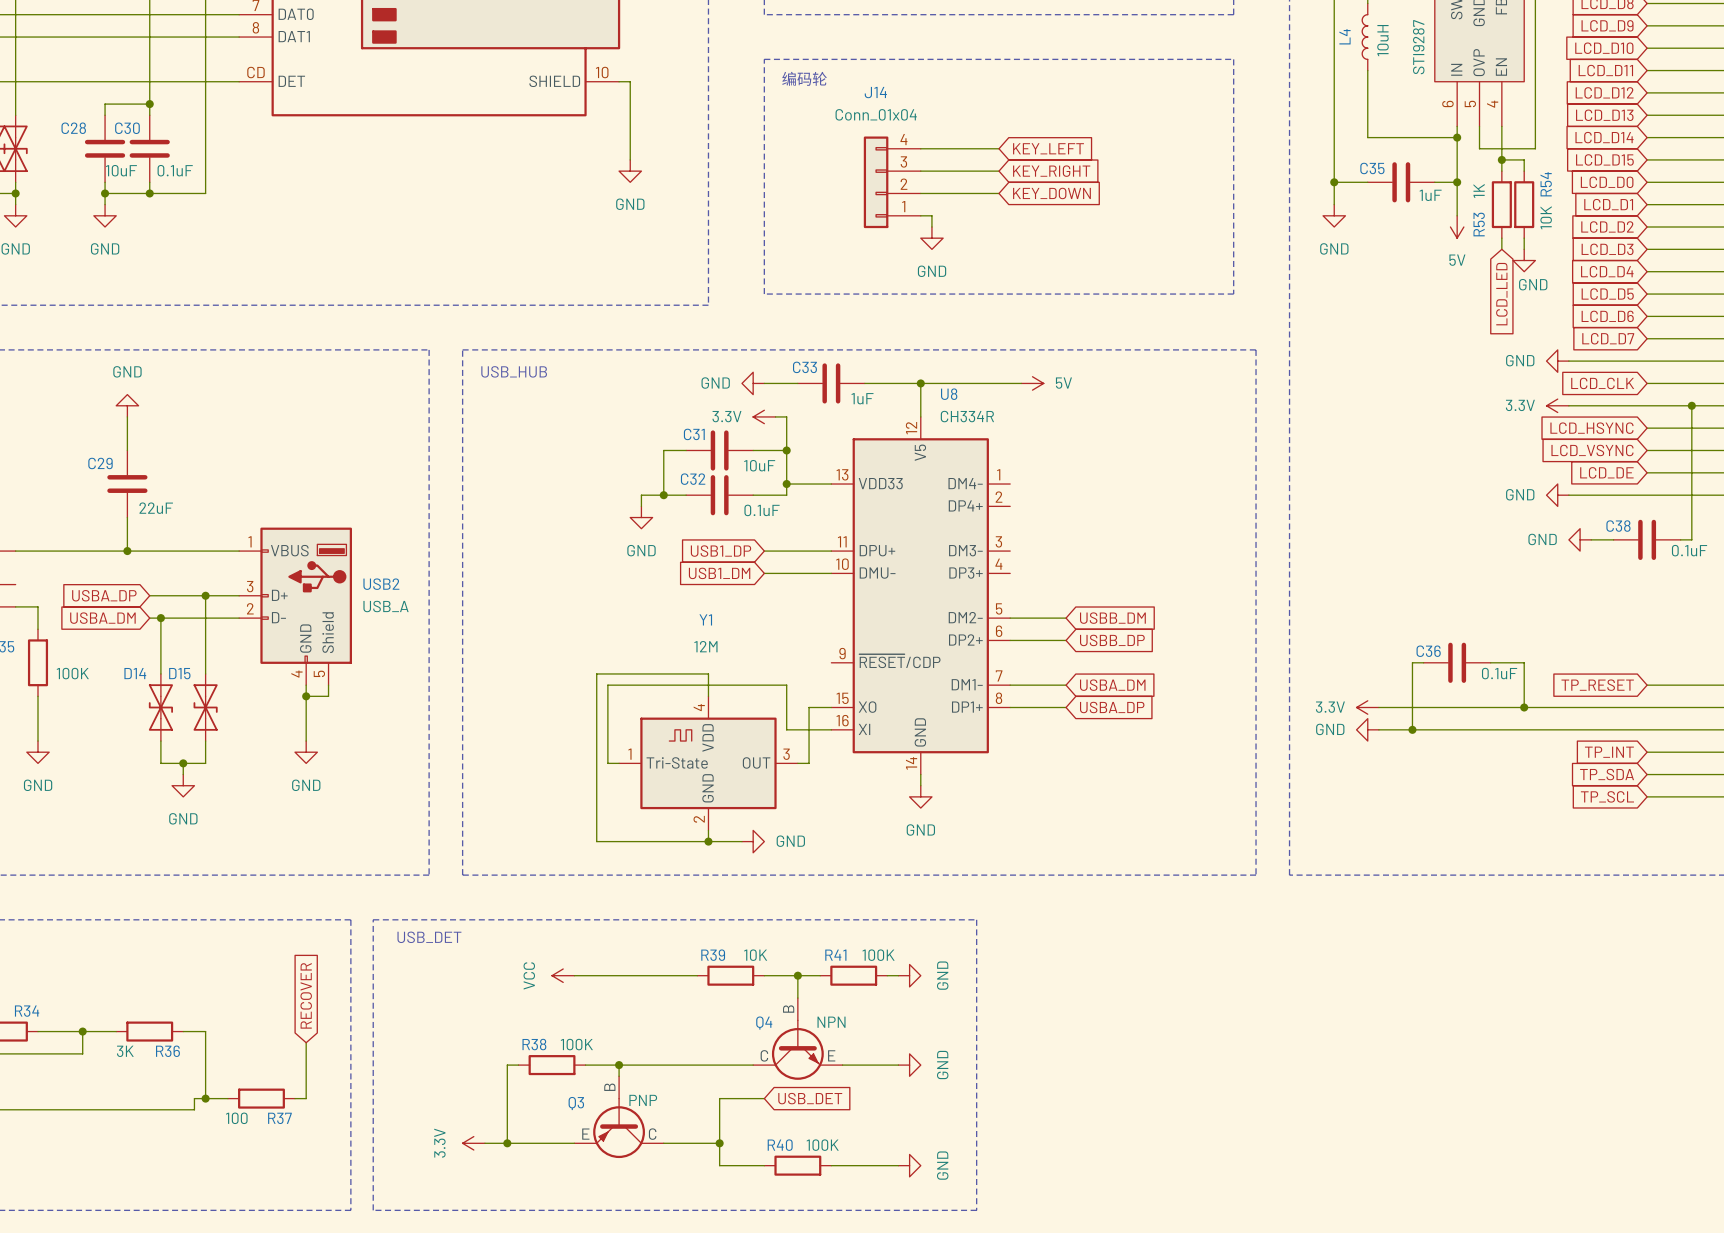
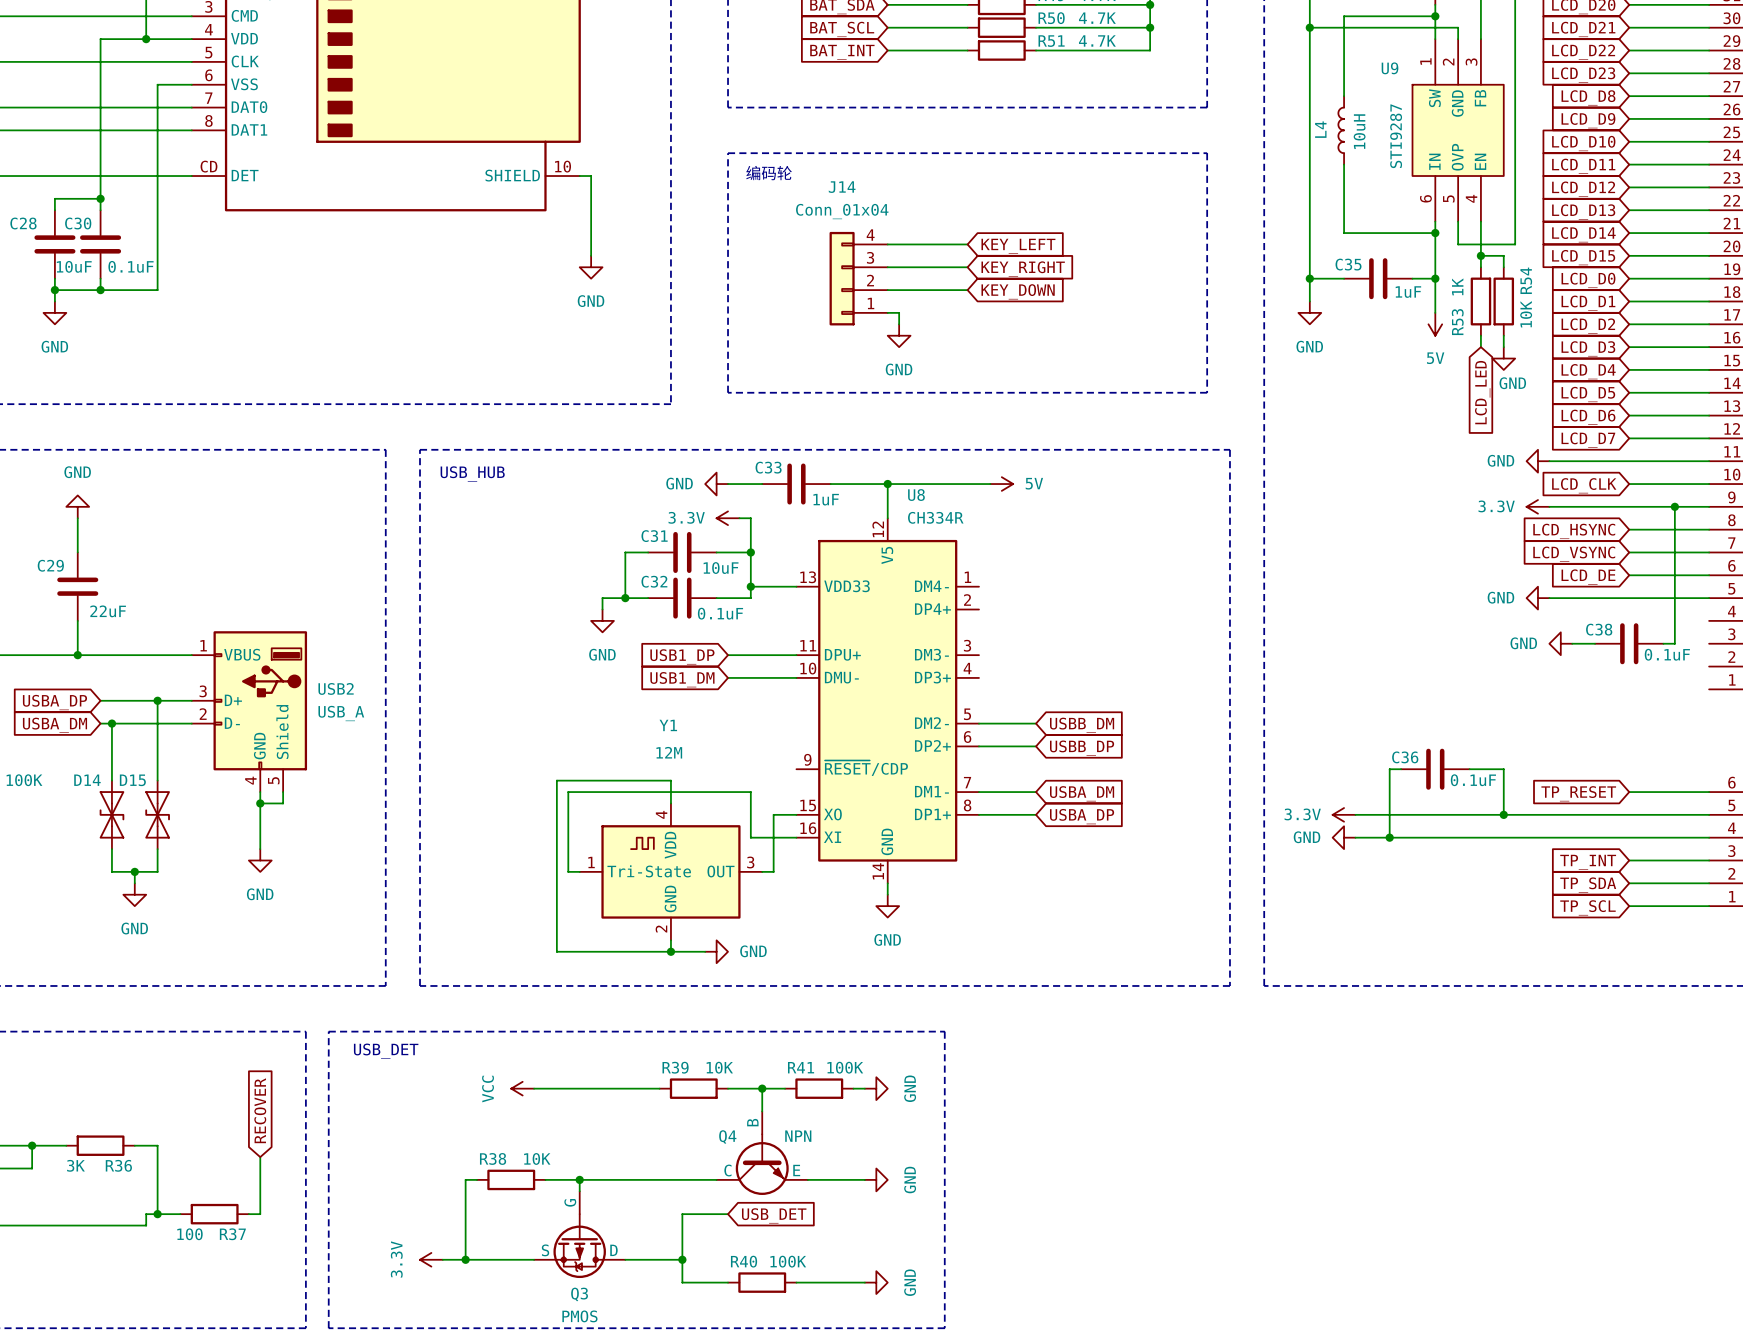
R38 value: 100K (576, 1044) -> 10K (537, 1158)
Q3 symbol: [574, 1076, 664, 1159] -> [534, 1191, 626, 1279]
Q3 value: PNP (643, 1100) -> PMOS (579, 1316)
Q3 name position: Q3 (576, 1103) -> Q3 (579, 1294)

